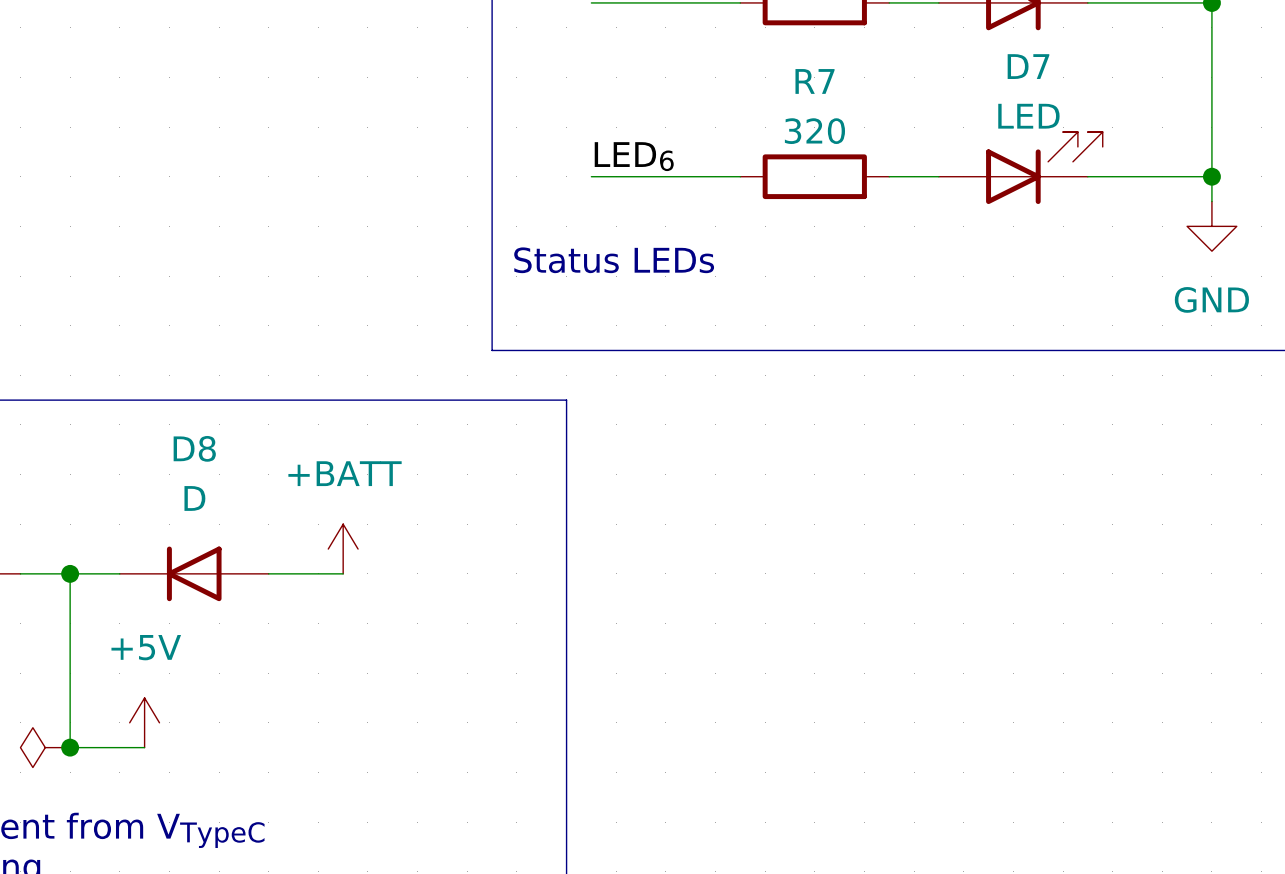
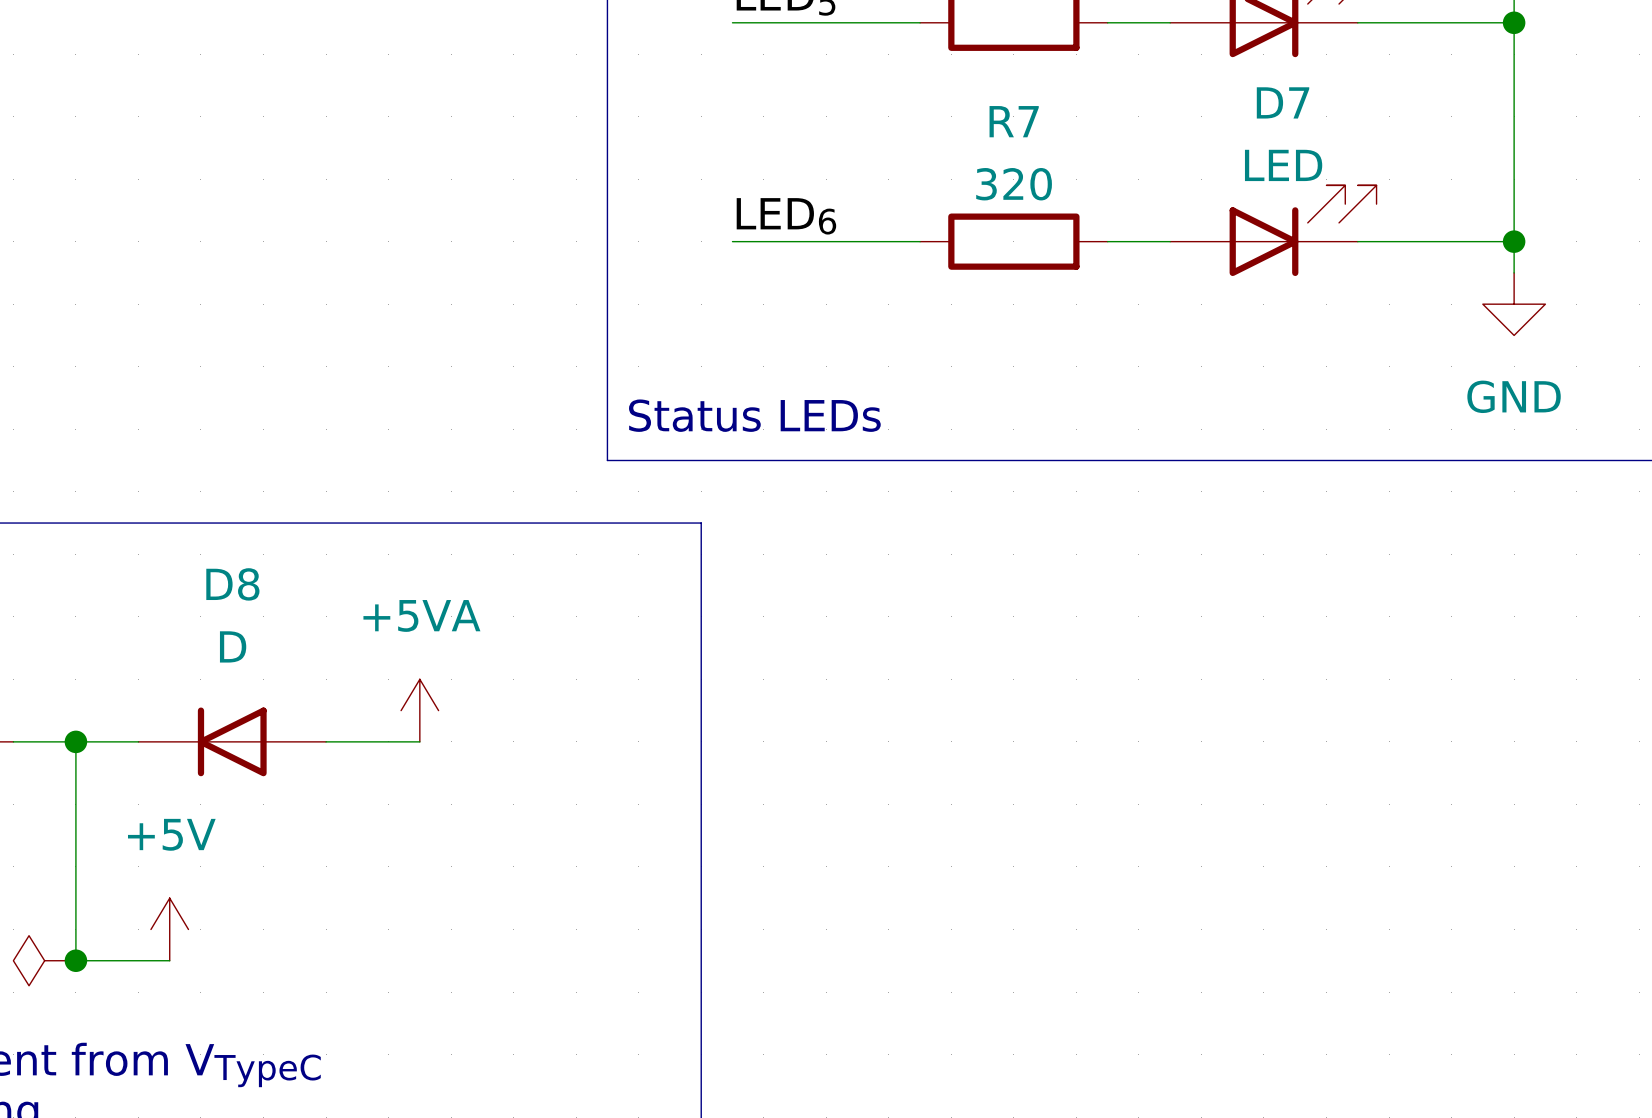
text position: Status LEDs (614, 260) -> Status LEDs (754, 415)
power symbol: +BATT (343, 549) -> +5VA (419, 710)

